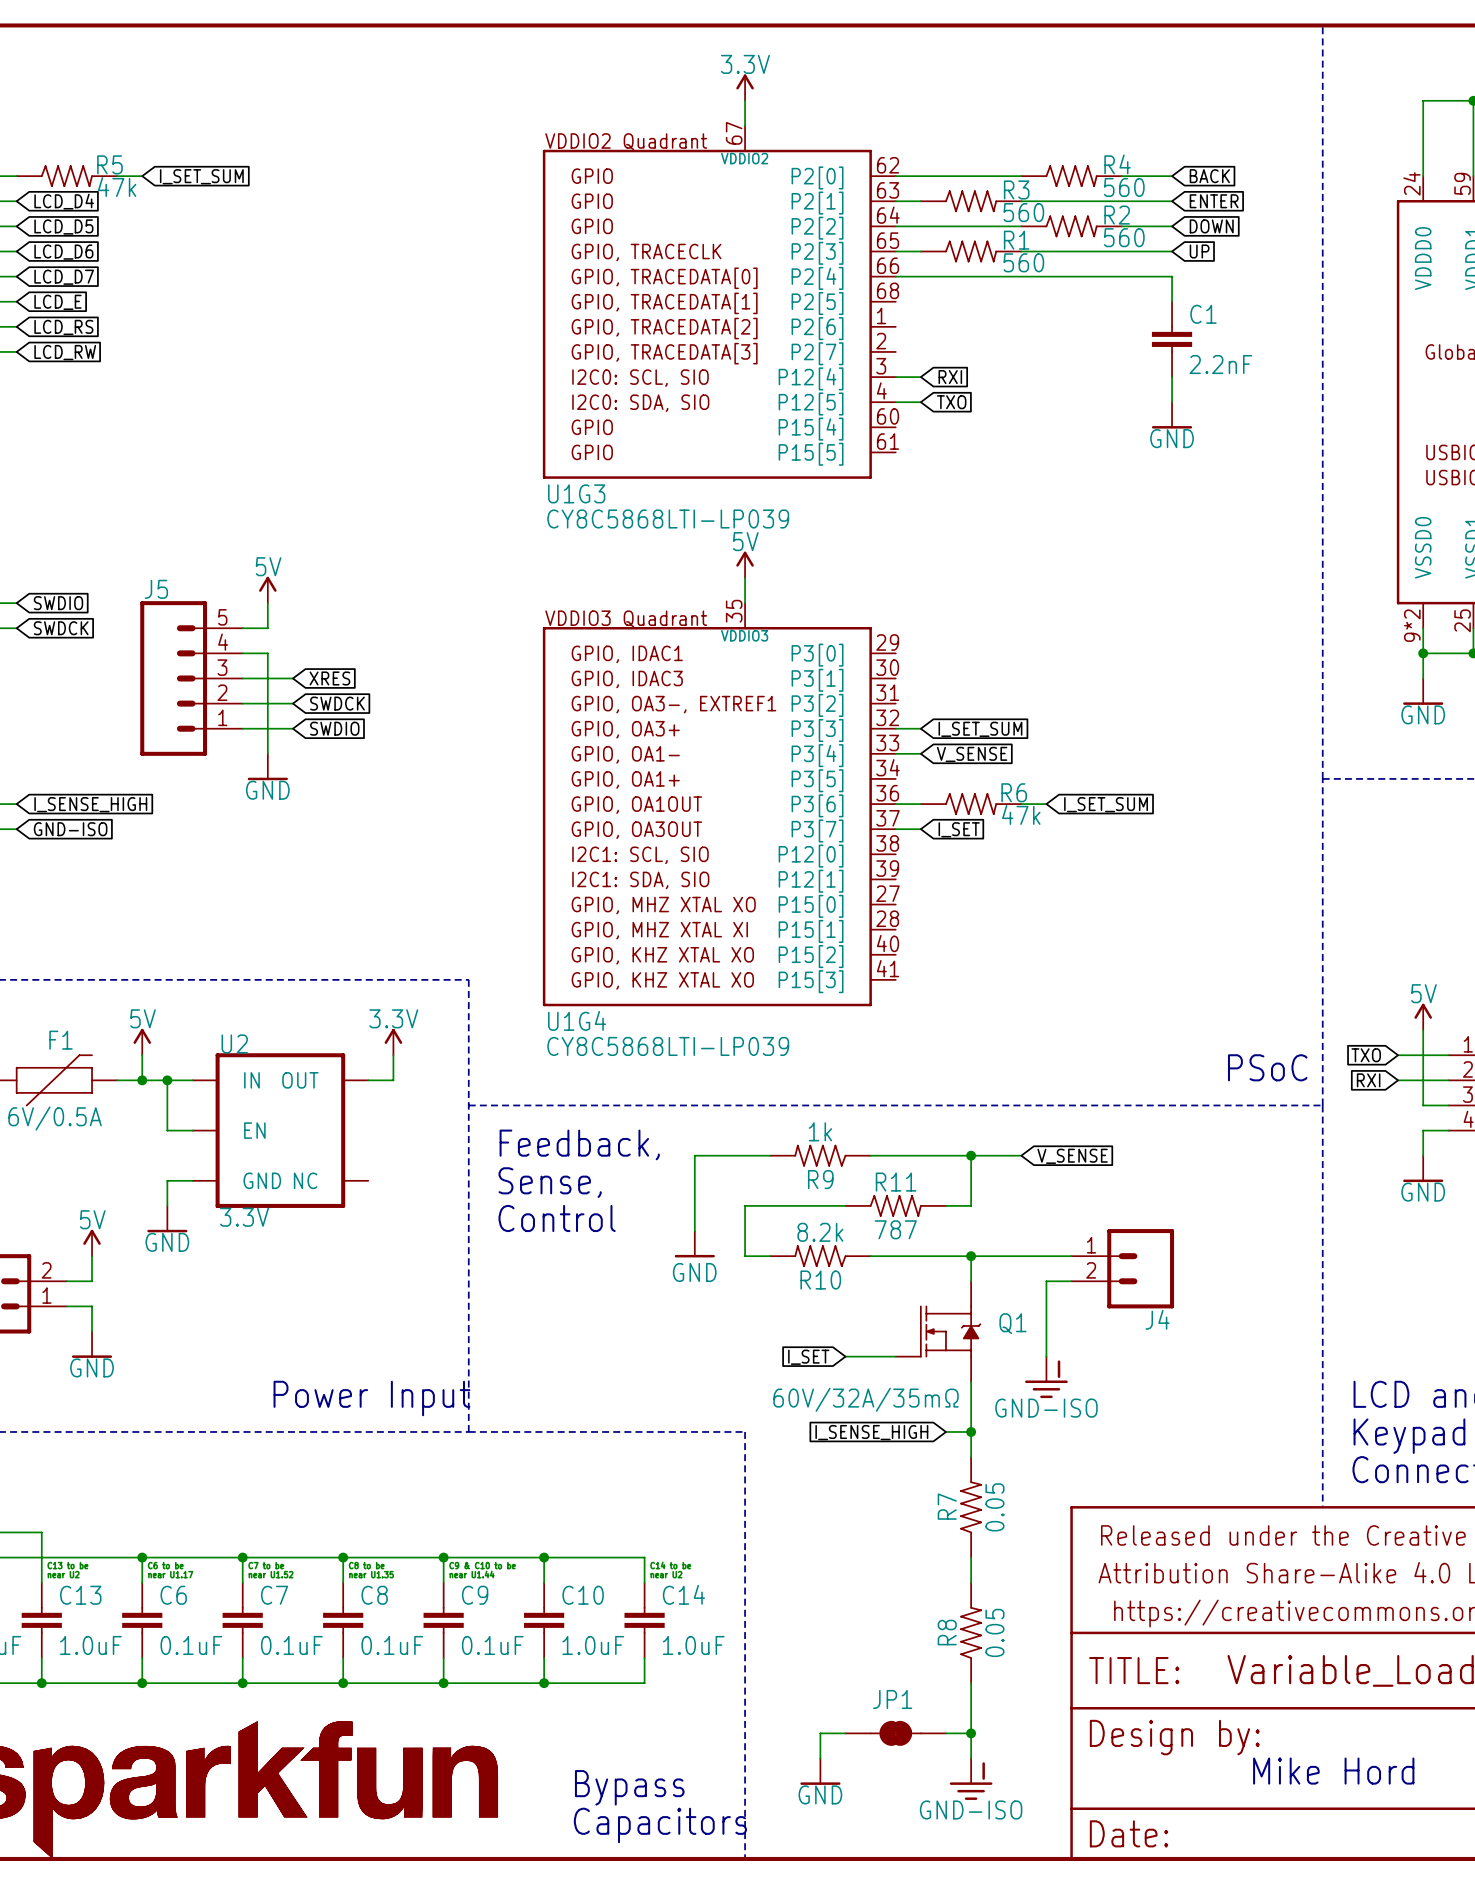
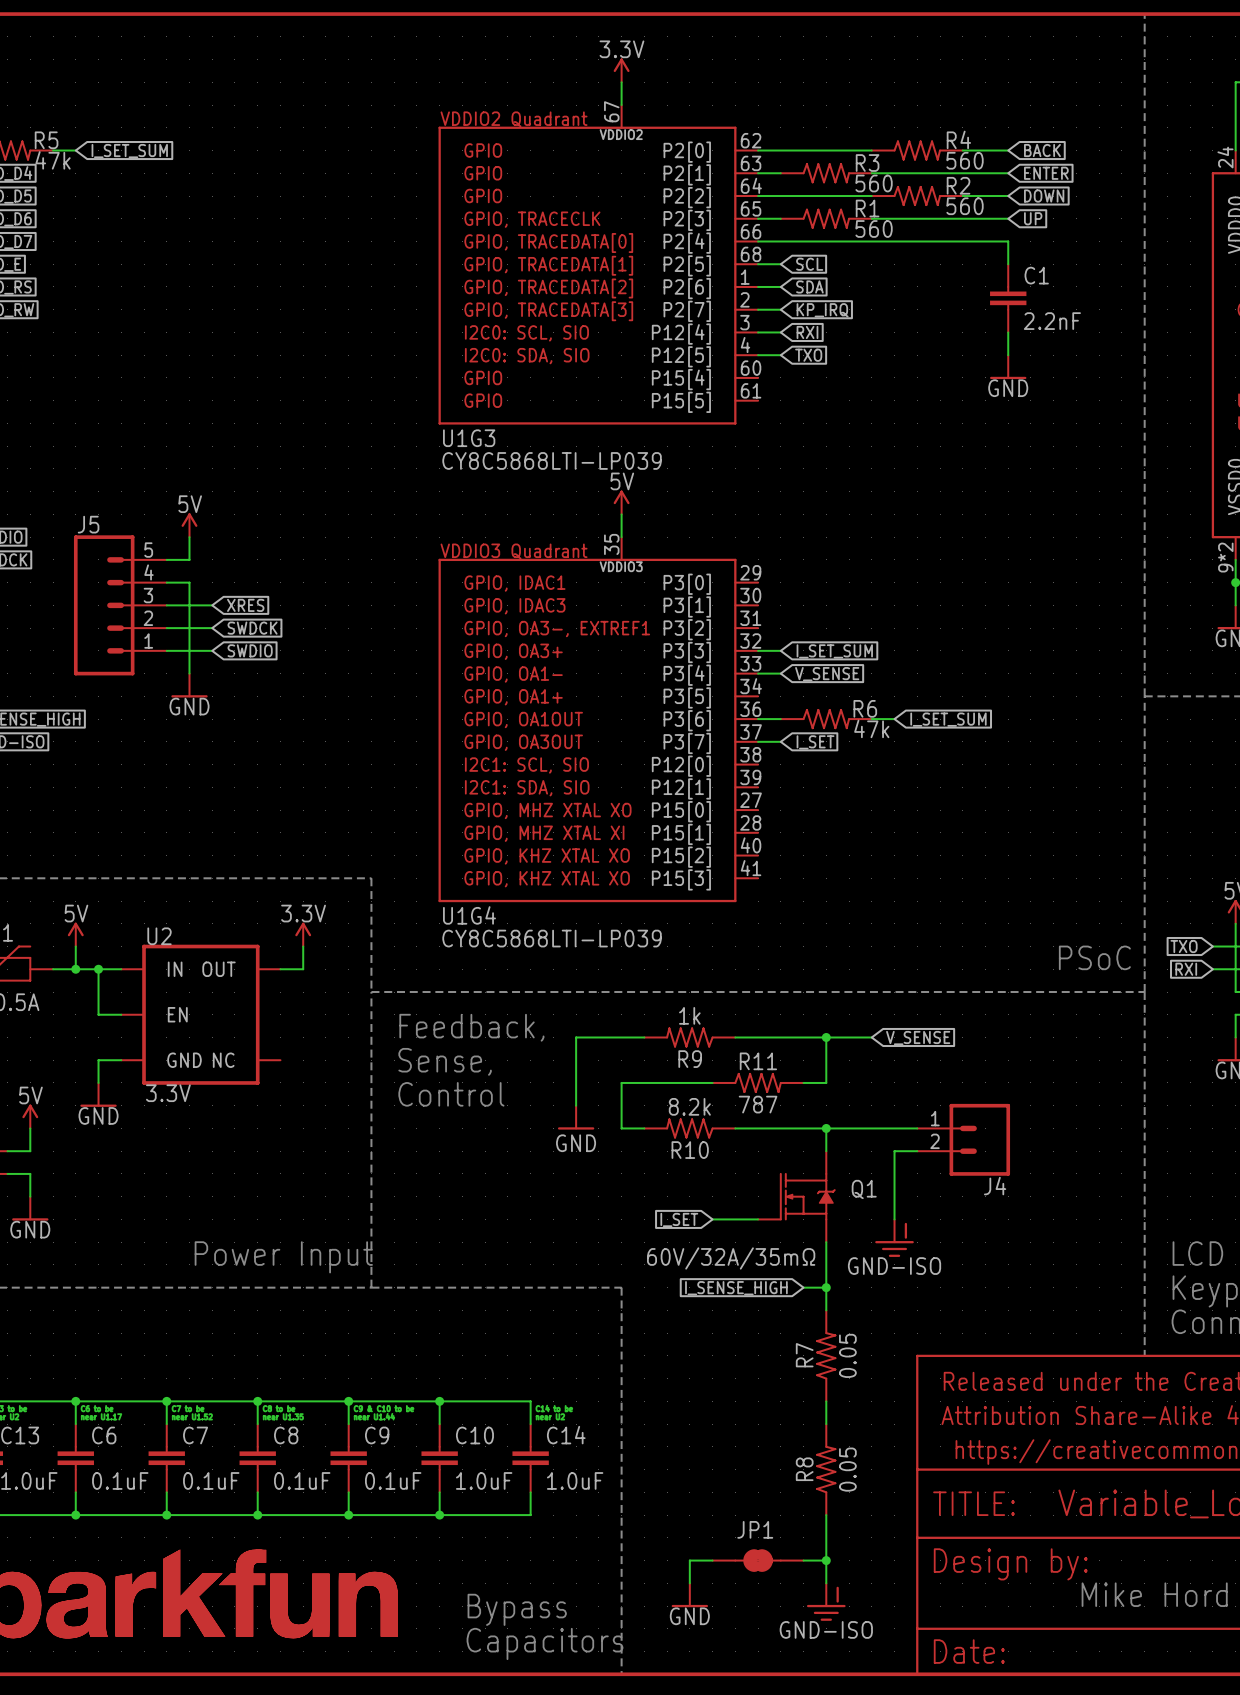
wire: none -> (758, 264) (780, 264)
global label: none -> SCL (809, 264)
wire: none -> (758, 286) (780, 286)
global label: none -> SDA (809, 286)
wire: none -> (758, 309) (780, 309)
global label: none -> KP_IRQ (822, 310)

